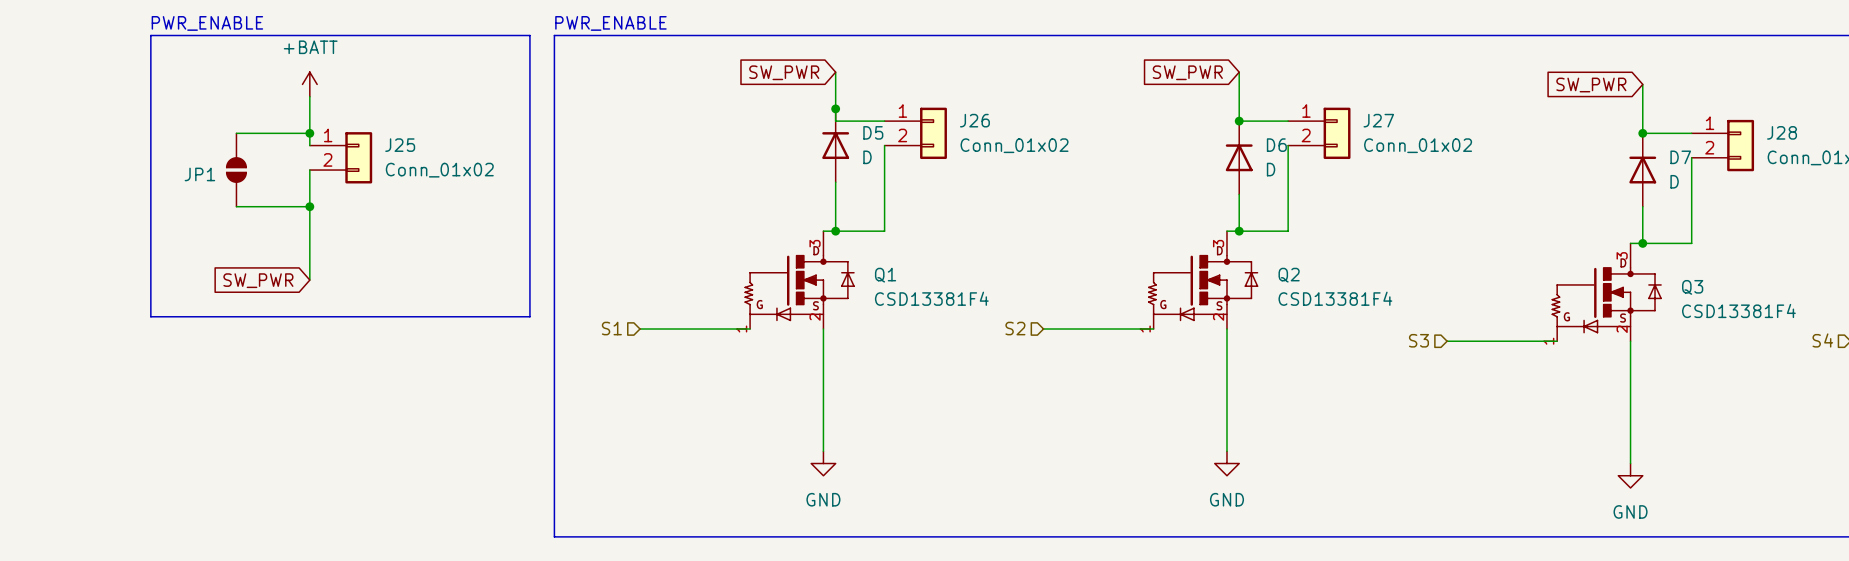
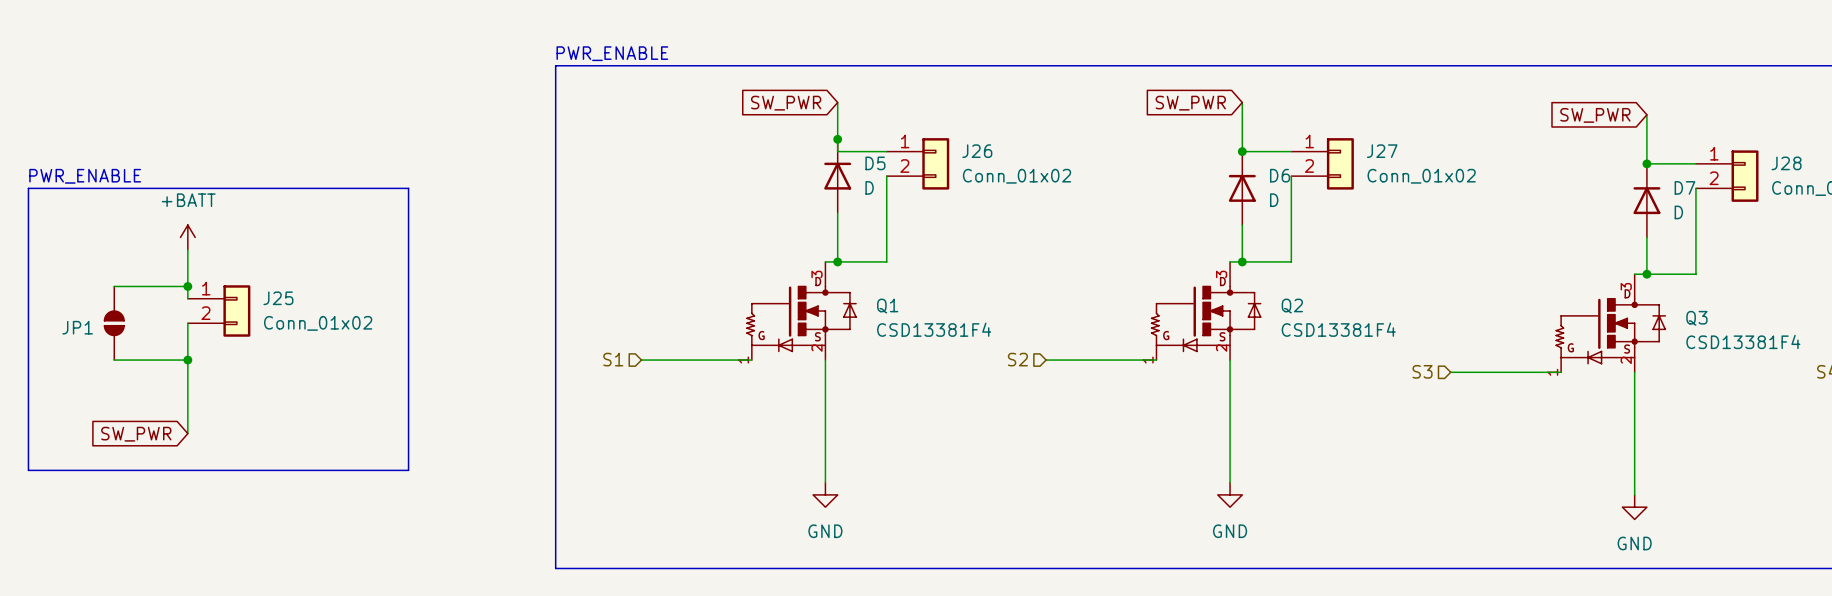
text position: PWR_ENABLE (207, 23) -> PWR_ENABLE (85, 176)
line: (150, 35) (529, 35) (529, 316) (150, 316) (150, 35) -> (28, 188) (408, 188) (408, 470) (28, 470) (28, 188)
power symbol position: +BATT (309, 84) -> +BATT (187, 237)
wire: (309, 96) (309, 145) -> (187, 249) (187, 298)
wire: (236, 133) (309, 133) -> (114, 286) (187, 286)
junction: (309, 133) -> none
J25 position: (341, 157) -> (219, 311)
JP1 position: (236, 170) -> (114, 323)
wire: (309, 170) (309, 280) -> (187, 323) (187, 433)
wire: (236, 206) (309, 206) -> (114, 360) (187, 360)
junction: (309, 206) -> none
junction: none -> (187, 286)
global label position: SW_PWR (258, 280) -> SW_PWR (136, 434)
junction: none -> (187, 360)

